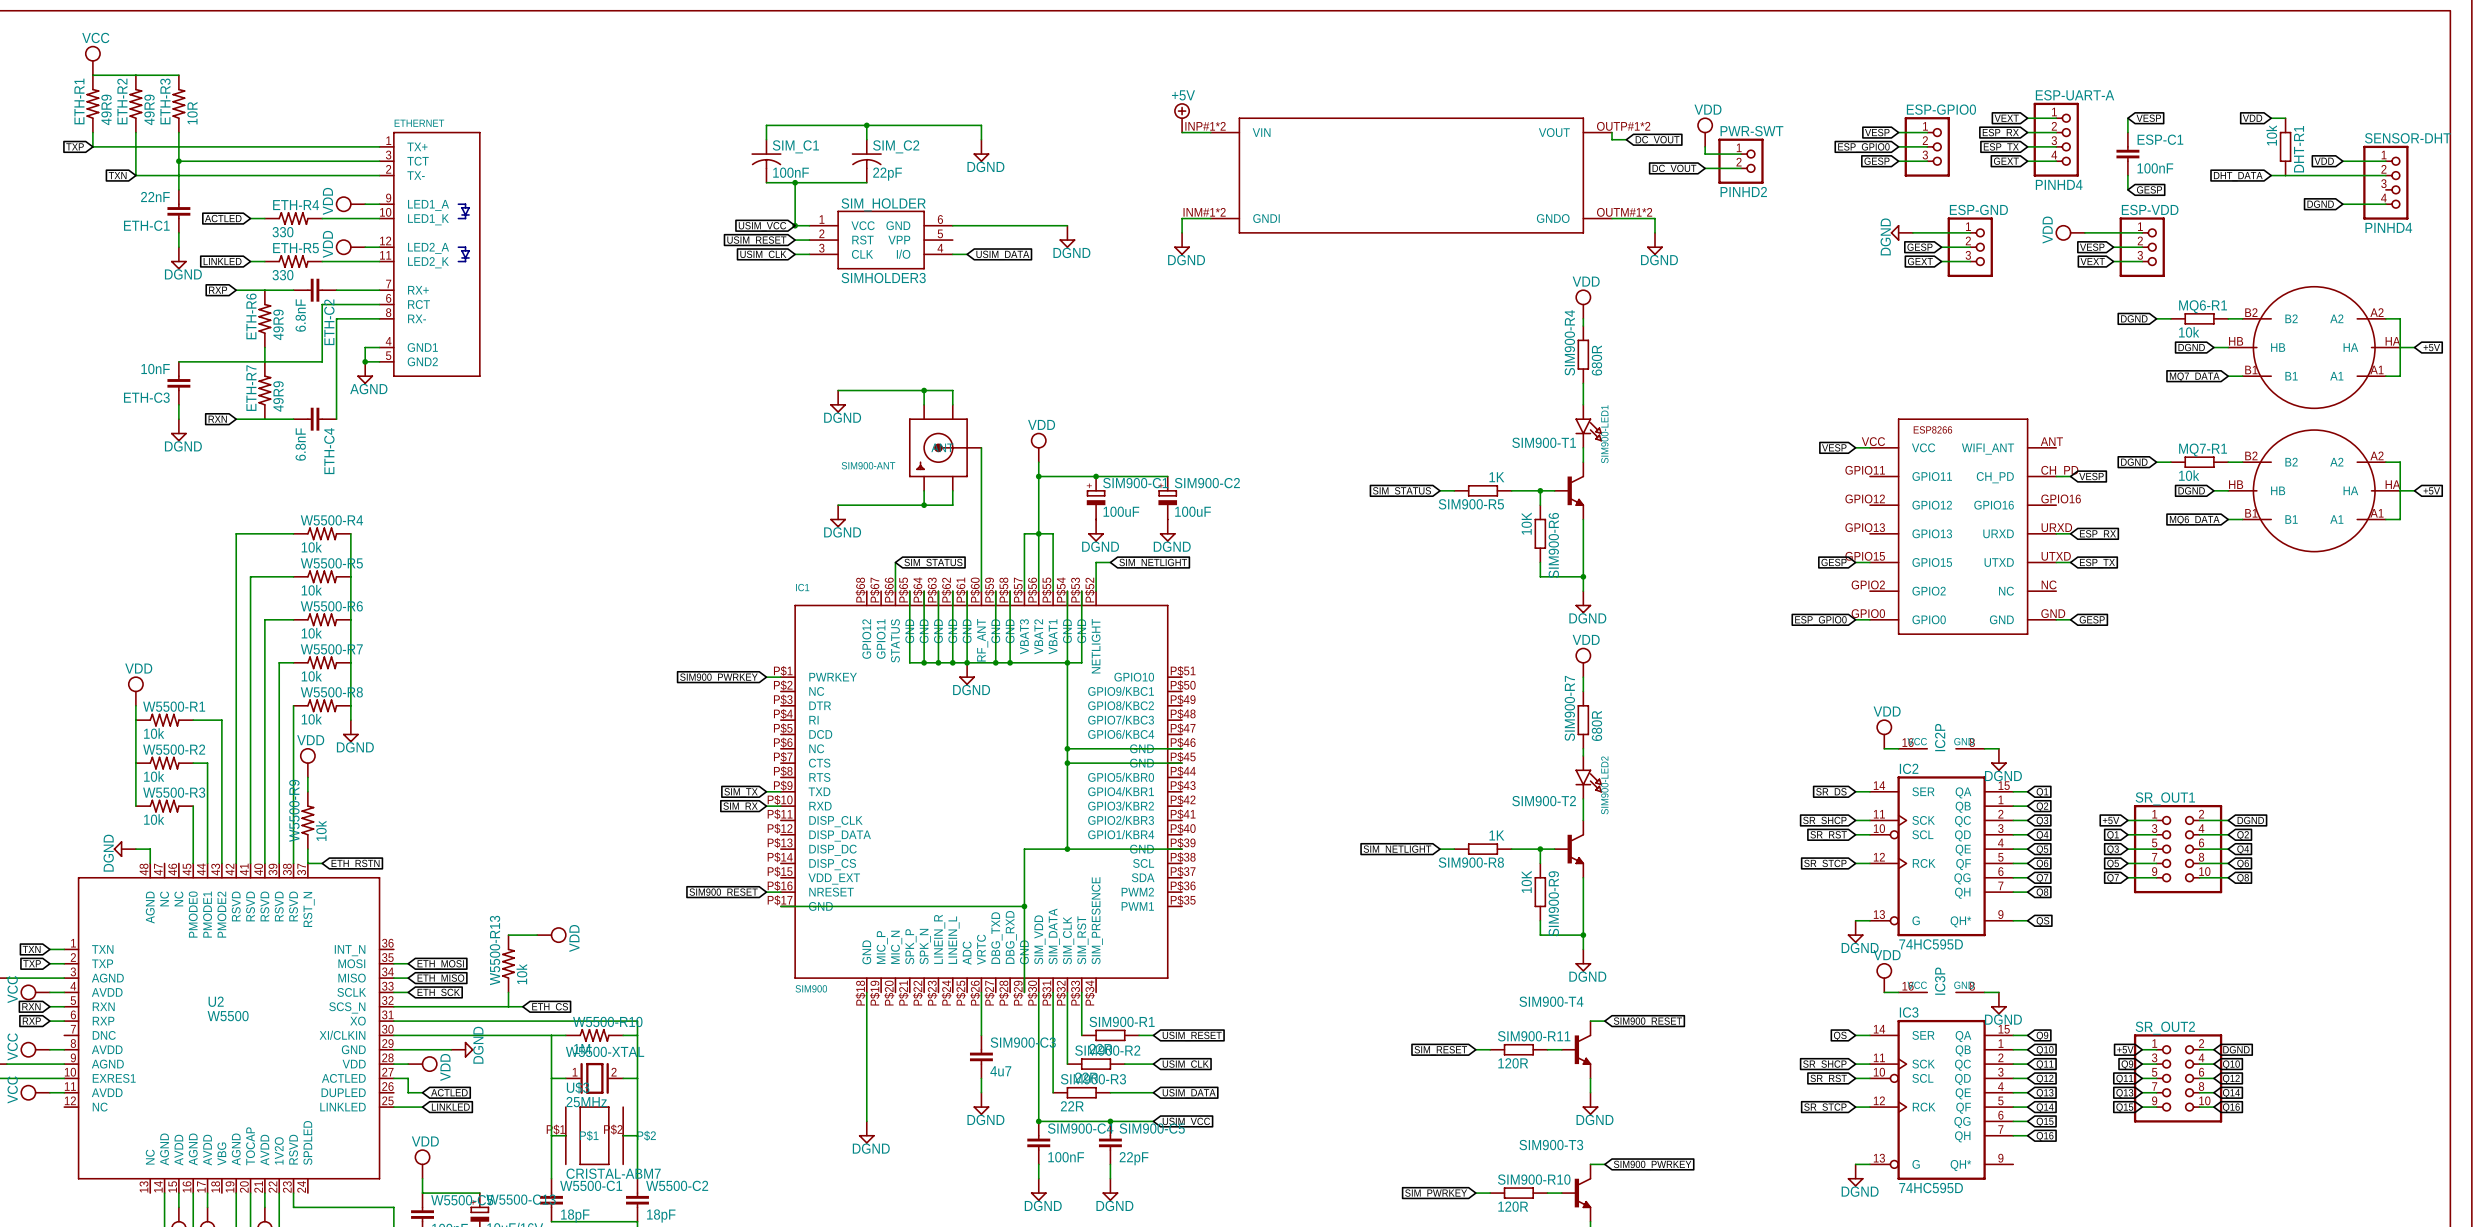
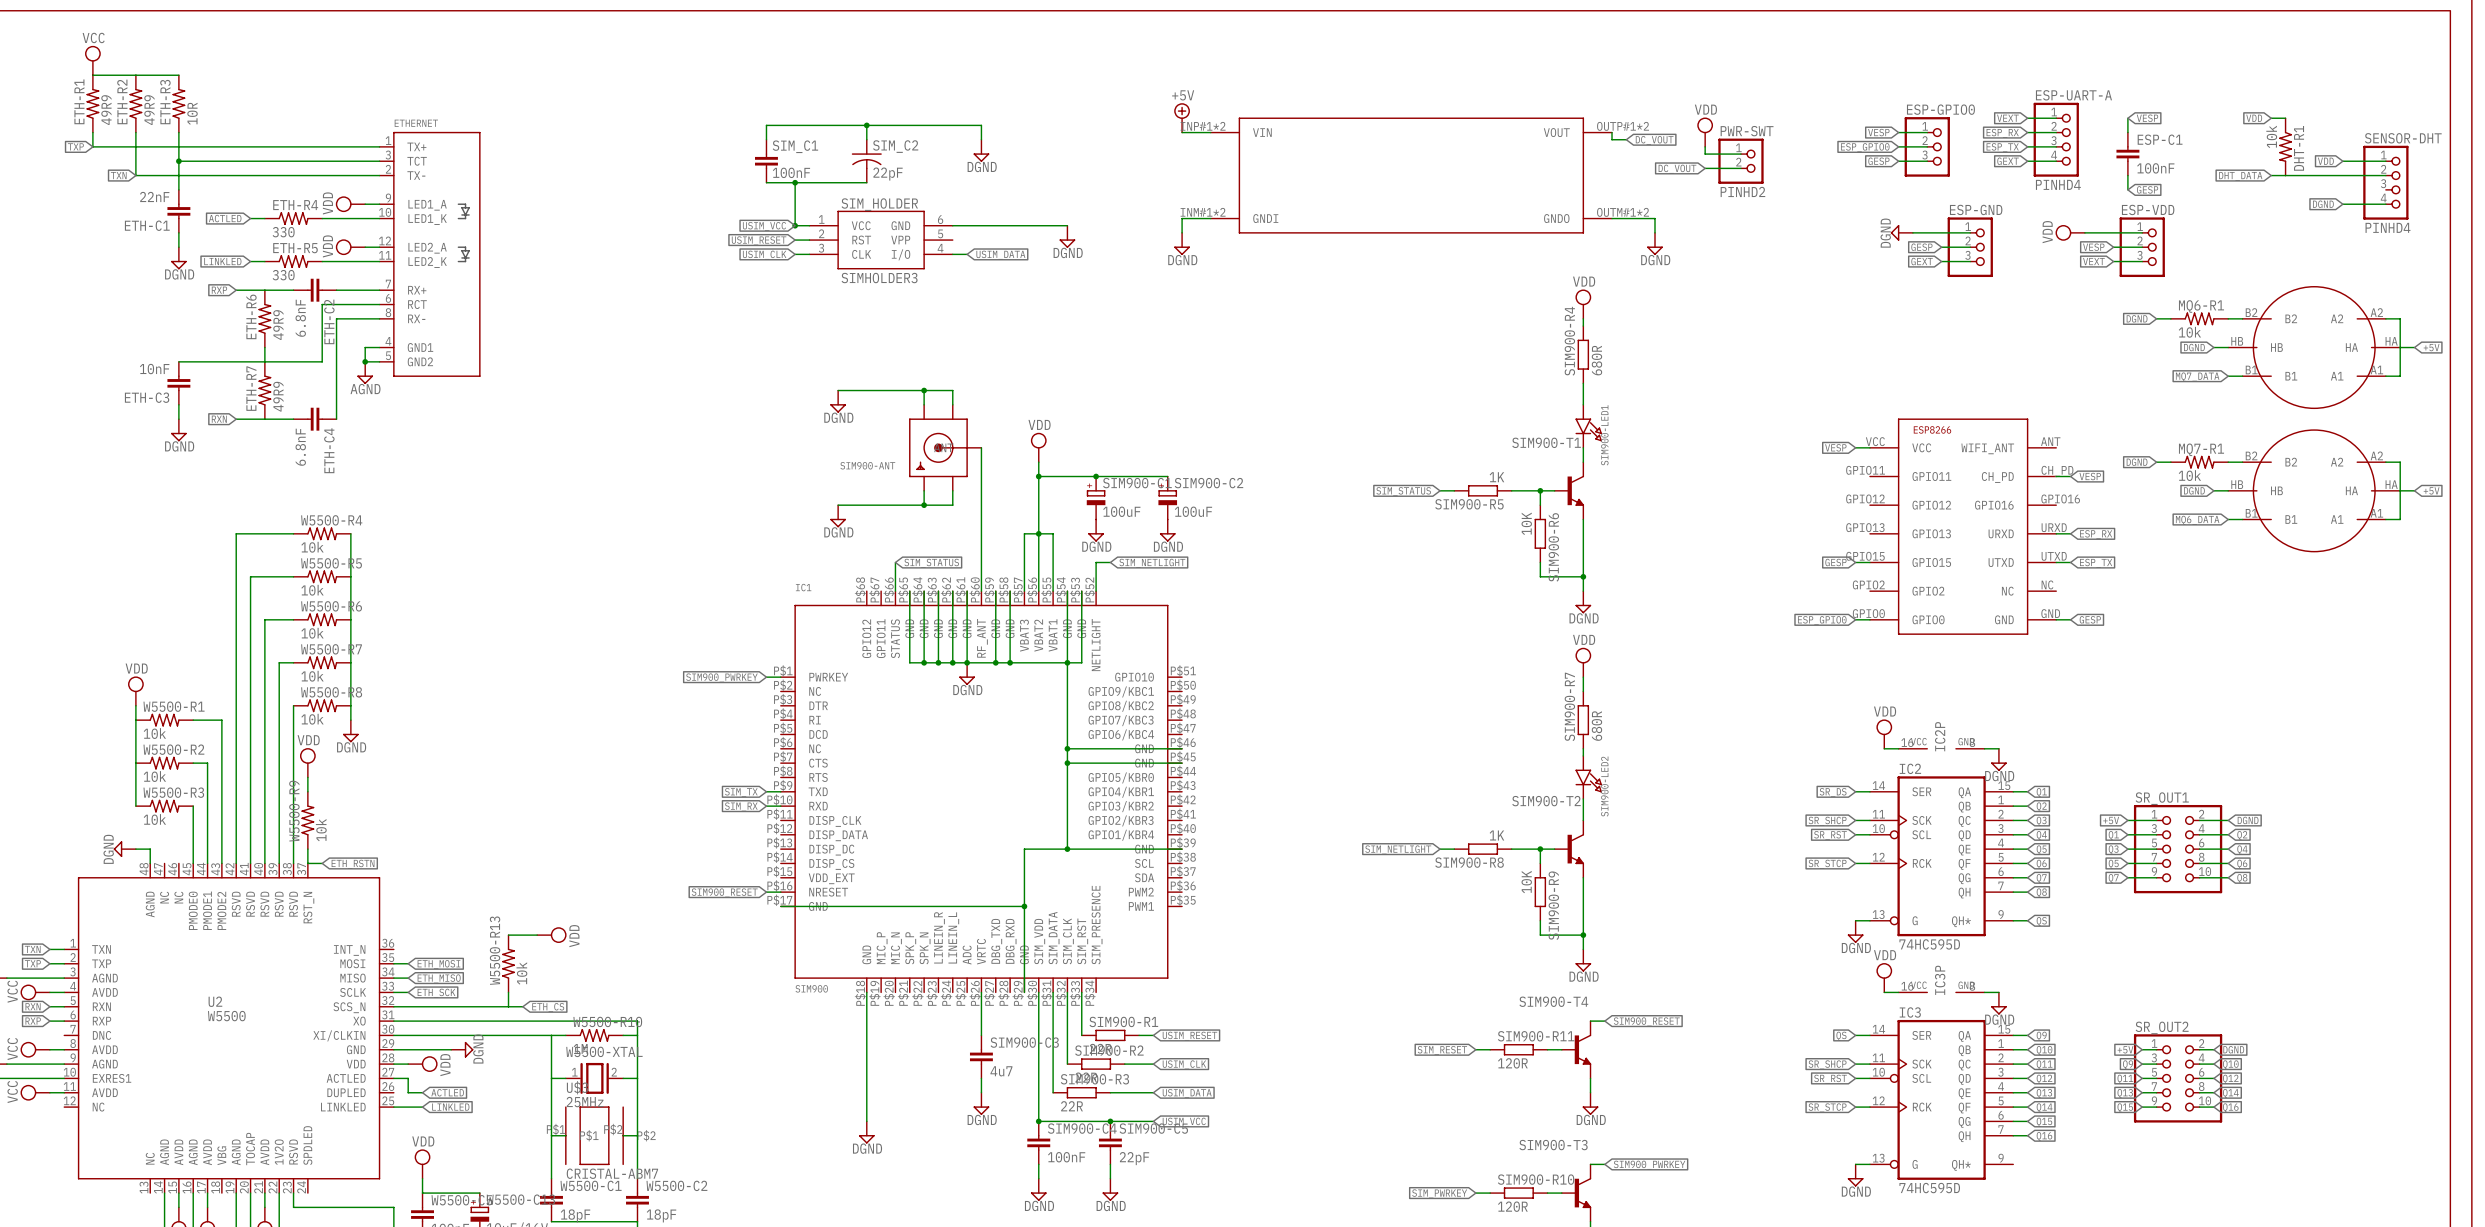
DHT-R1 symbol: [2279, 118, 2292, 176] -> [2279, 118, 2292, 176]
SIM_C1 symbol: [751, 139, 782, 183] -> [755, 139, 778, 183]
MQ6-R1 symbol: [2170, 313, 2229, 325] -> [2170, 312, 2229, 326]
MQ7-R1 symbol: [2170, 456, 2229, 468] -> [2170, 455, 2229, 469]

